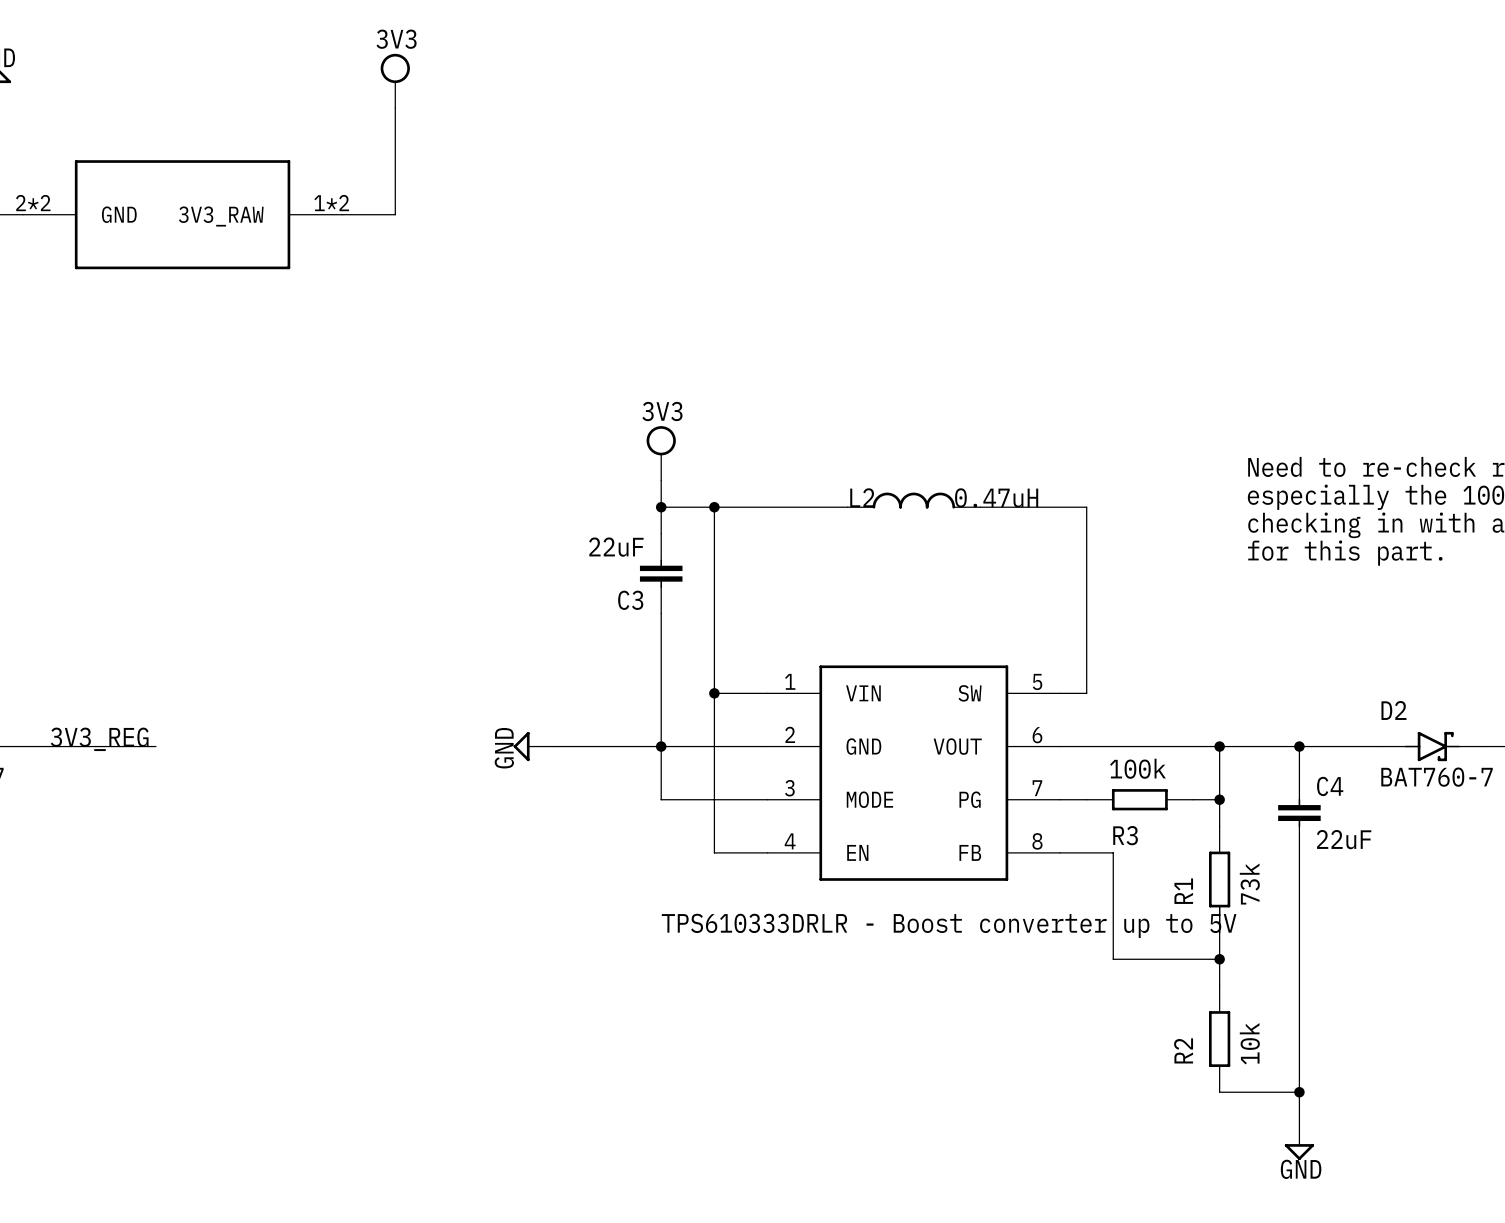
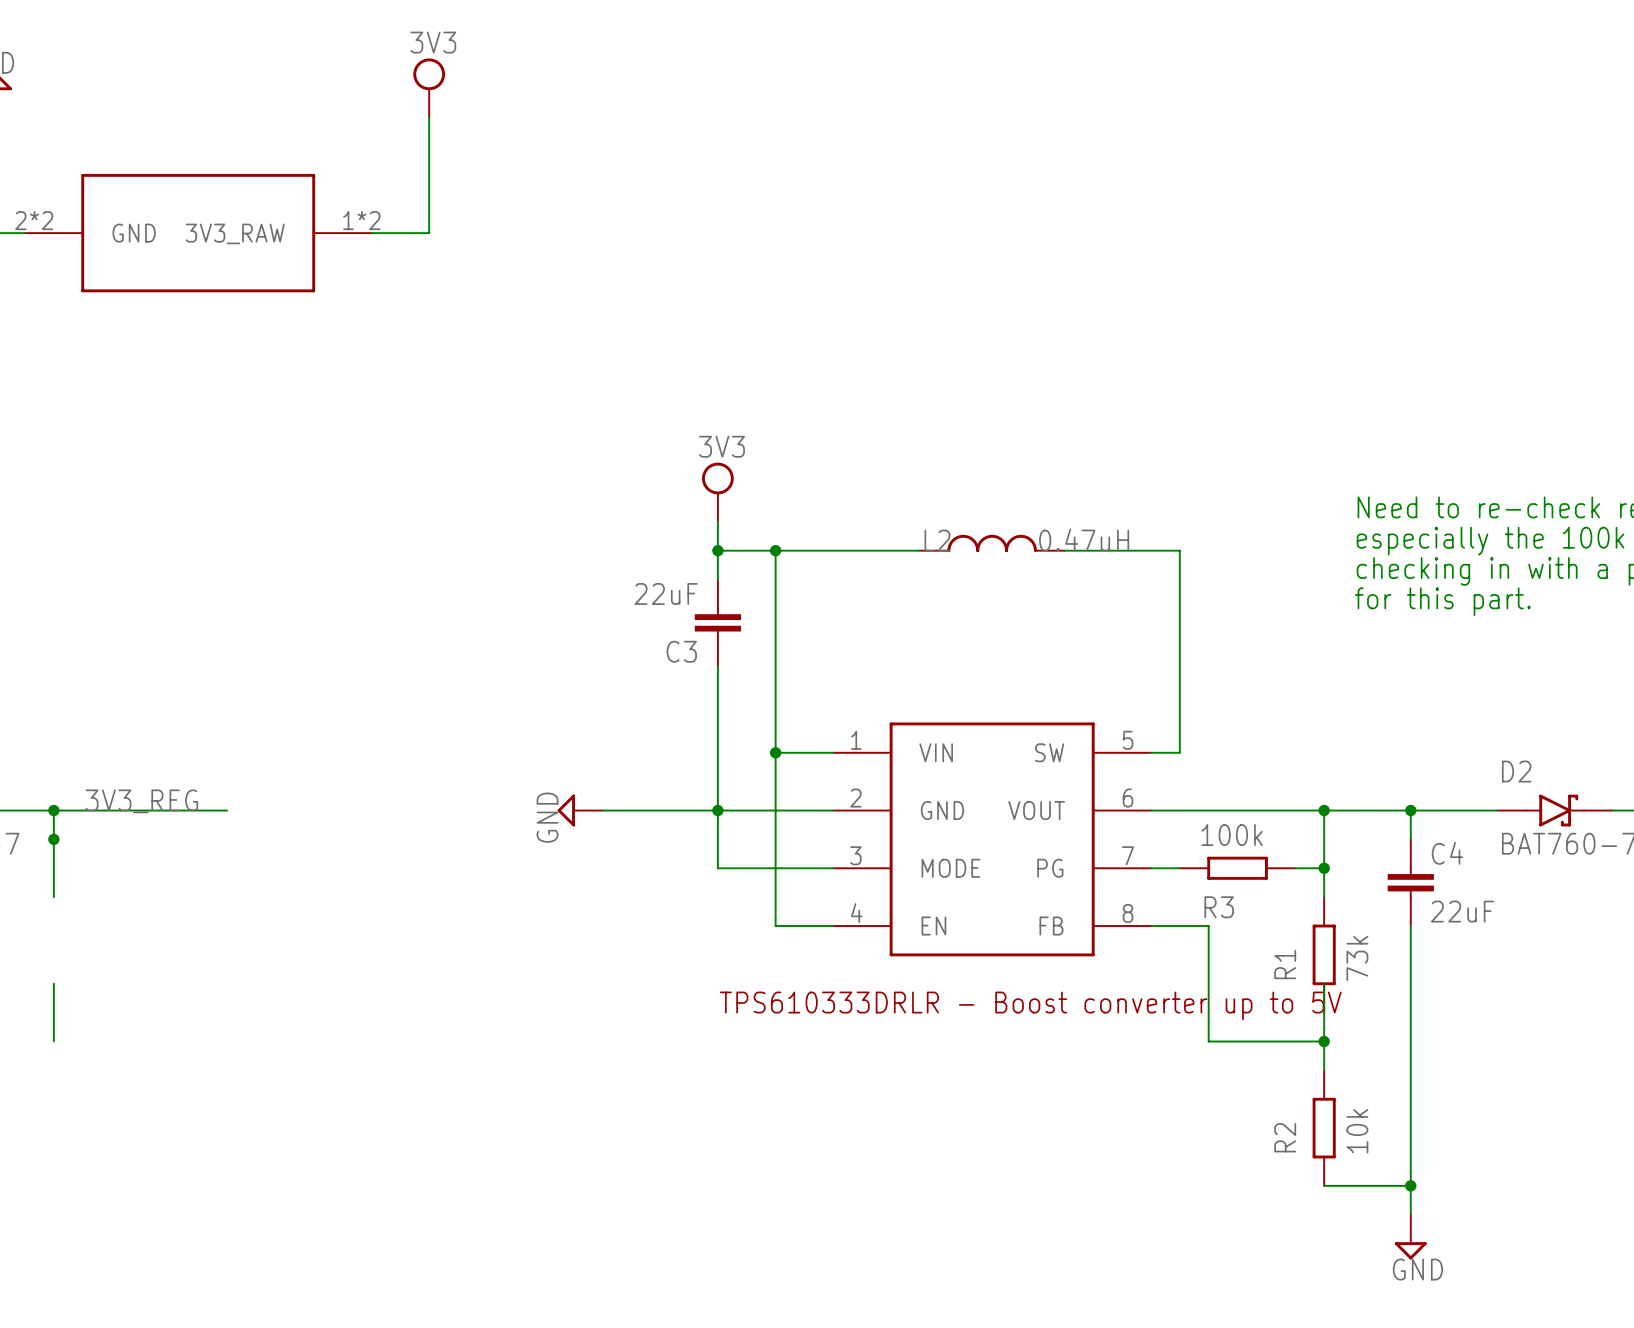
label position: 3V3_REG (99, 739) -> 3V3_REG (141, 801)
wire: none -> (53, 810) (53, 897)
junction: none -> (53, 810)
wire: none -> (169, 810) (227, 810)
junction: none -> (53, 839)
wire: none -> (53, 983) (53, 1041)

